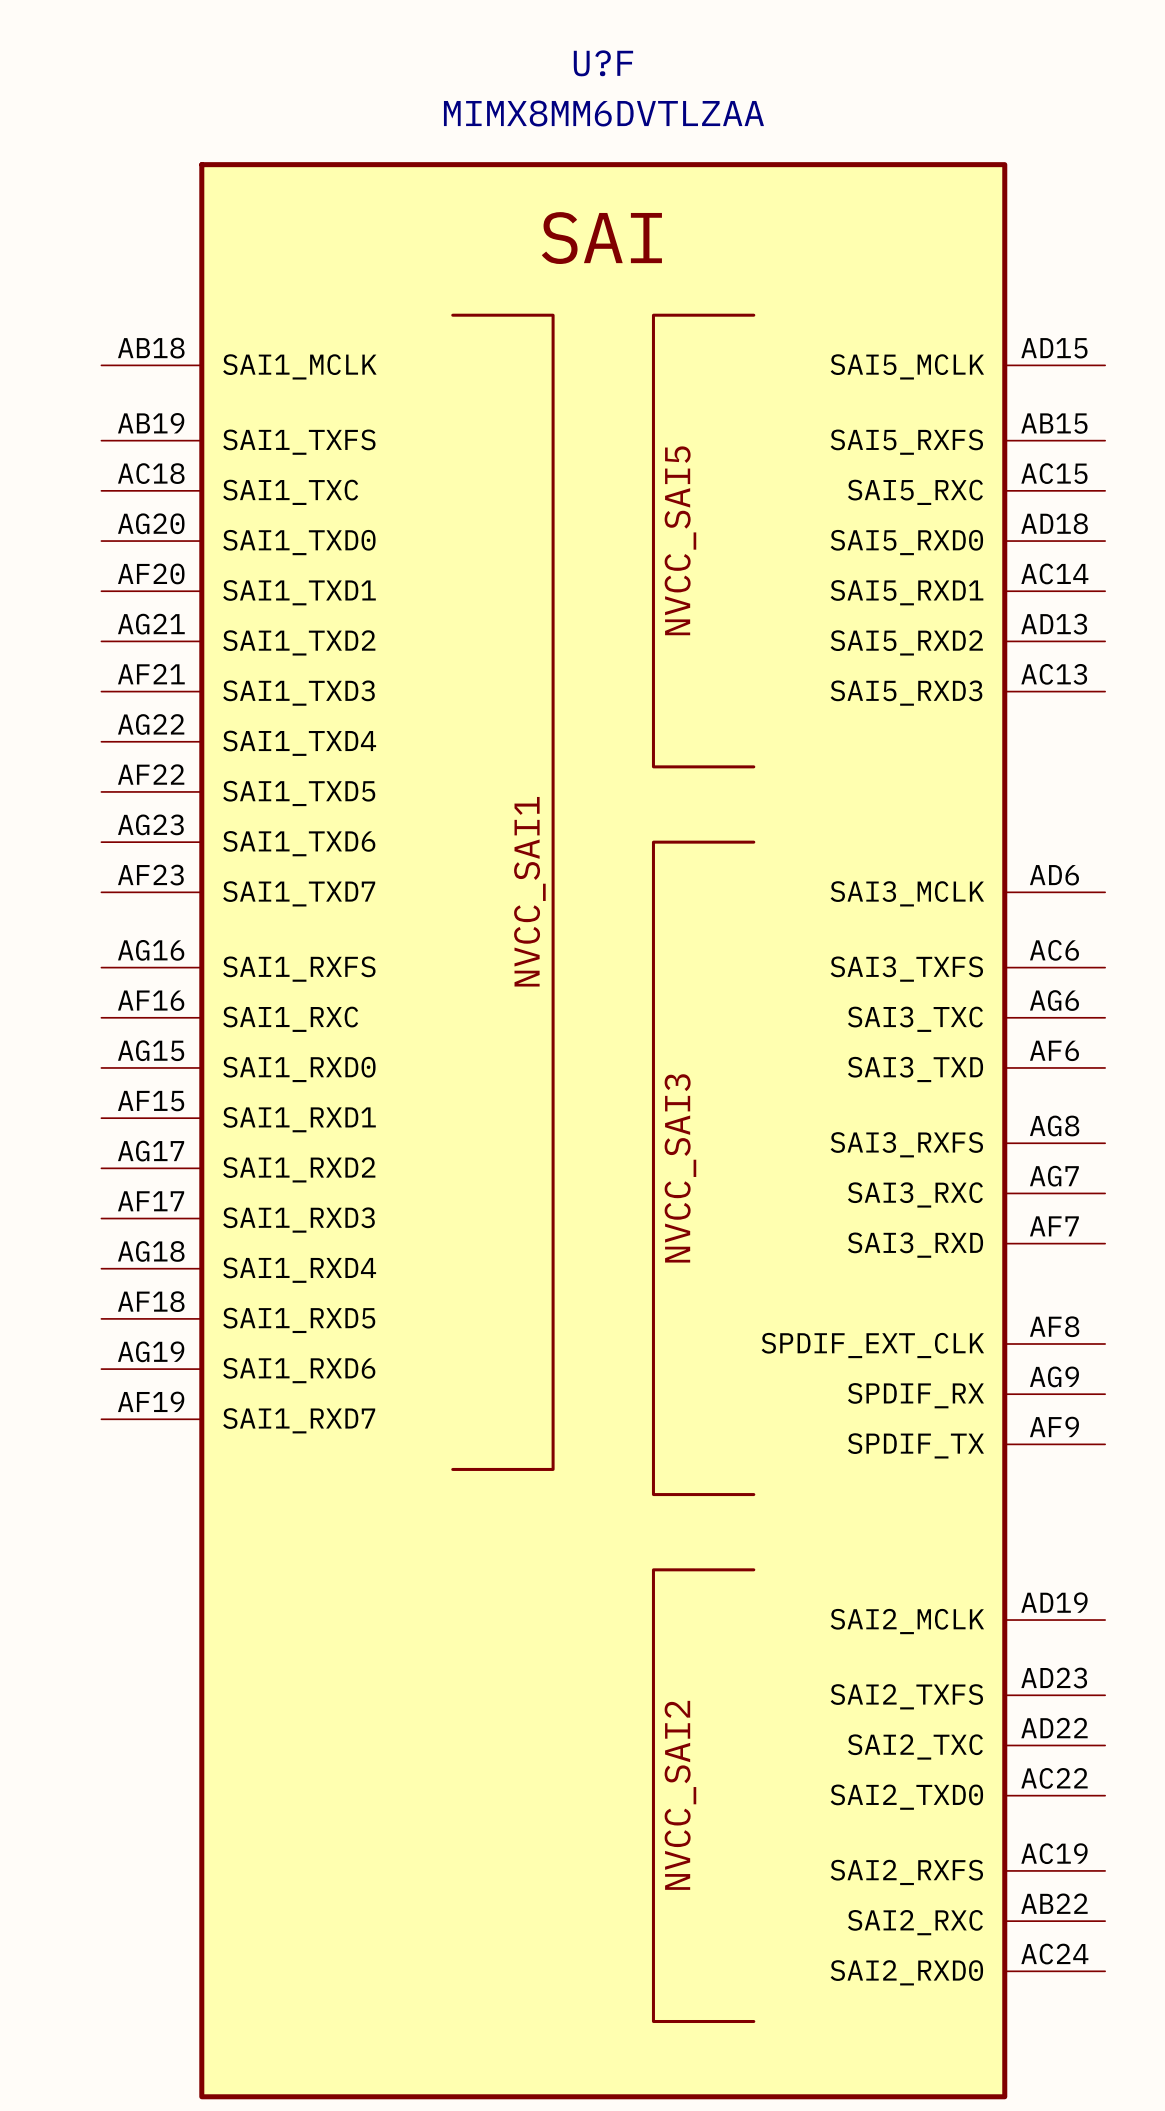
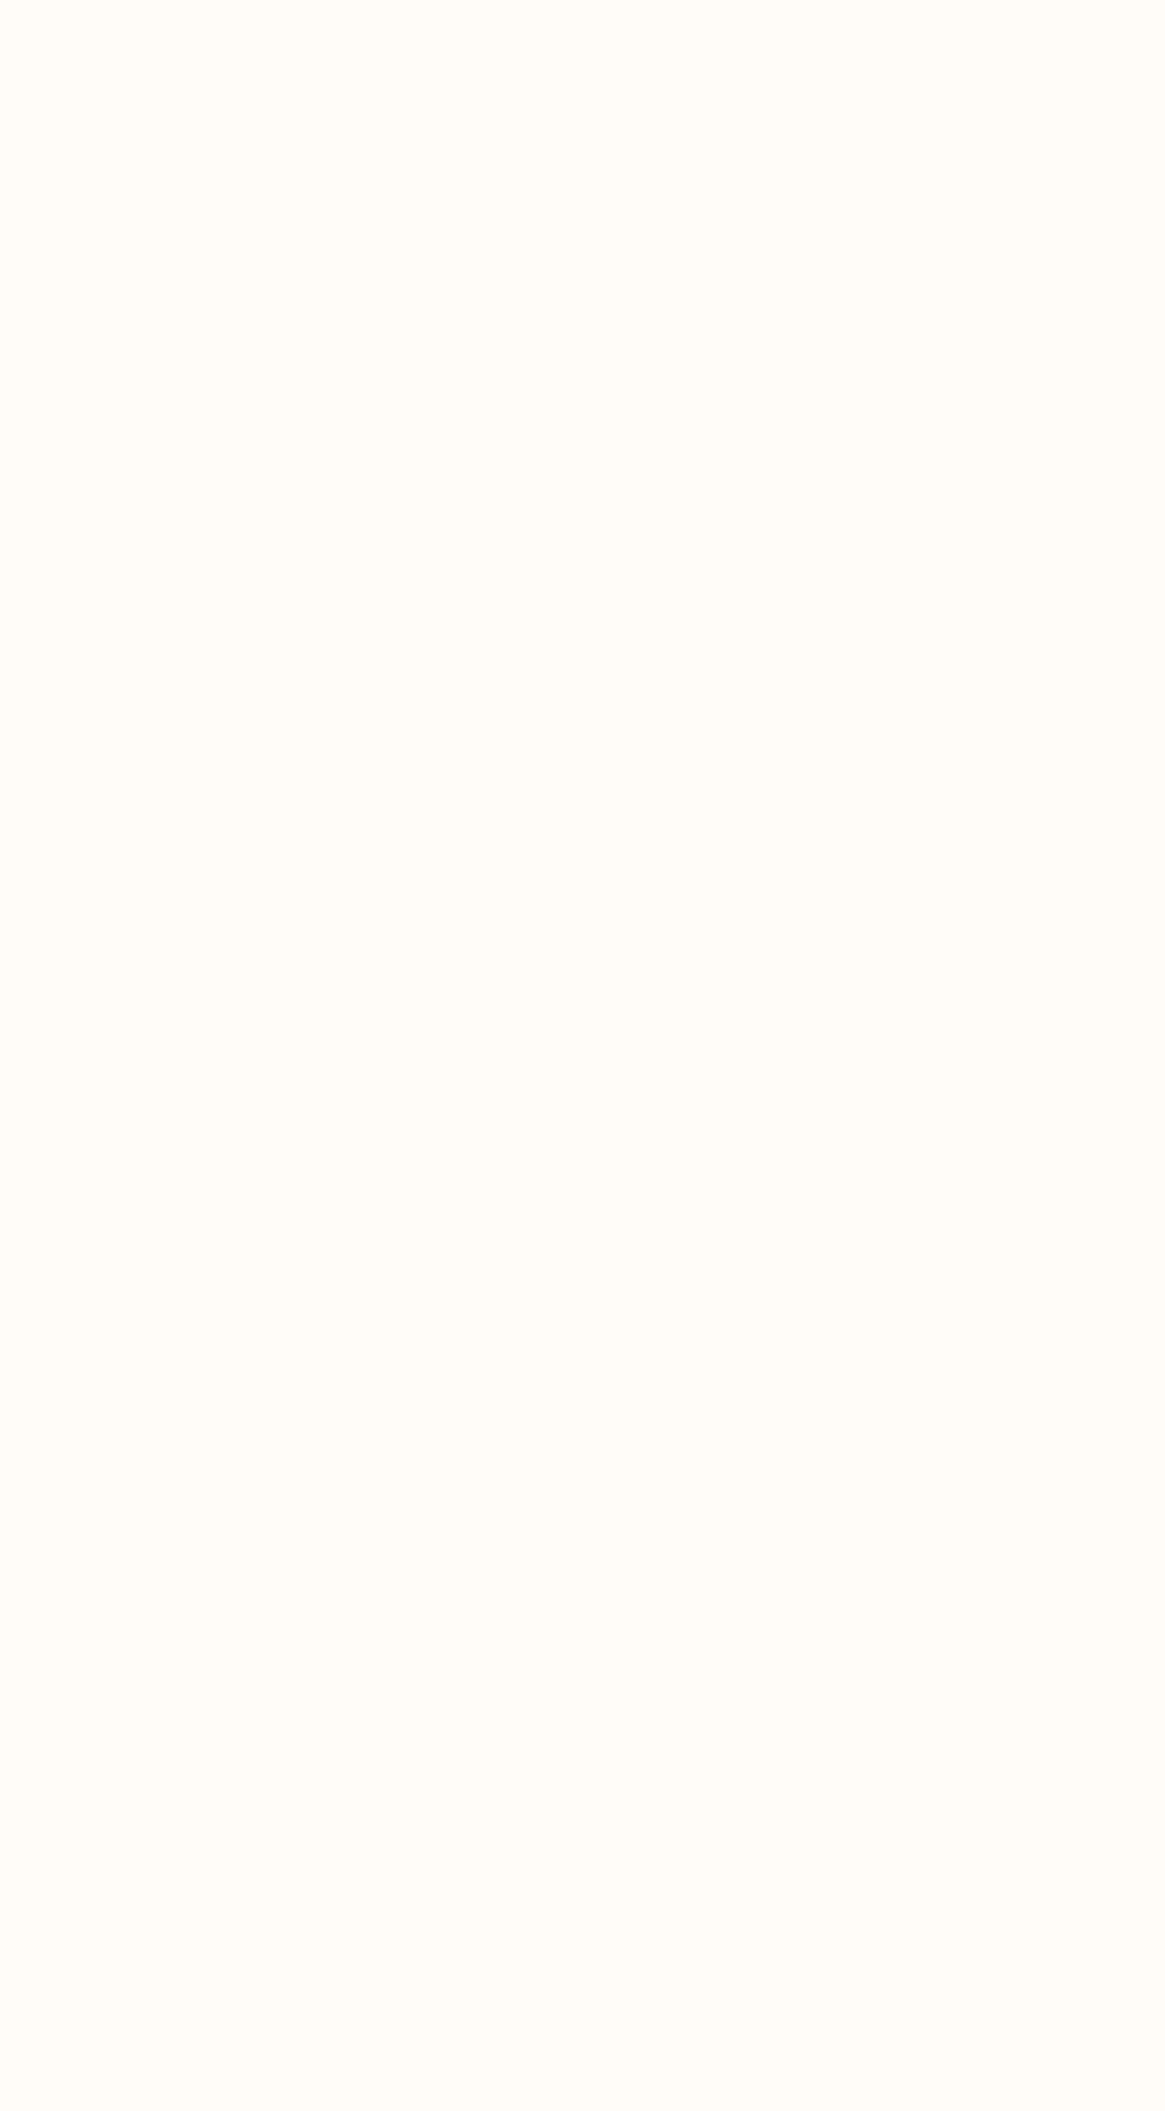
U?F: MIMX8MM6DVTLZAA (603, 1130) -> none

